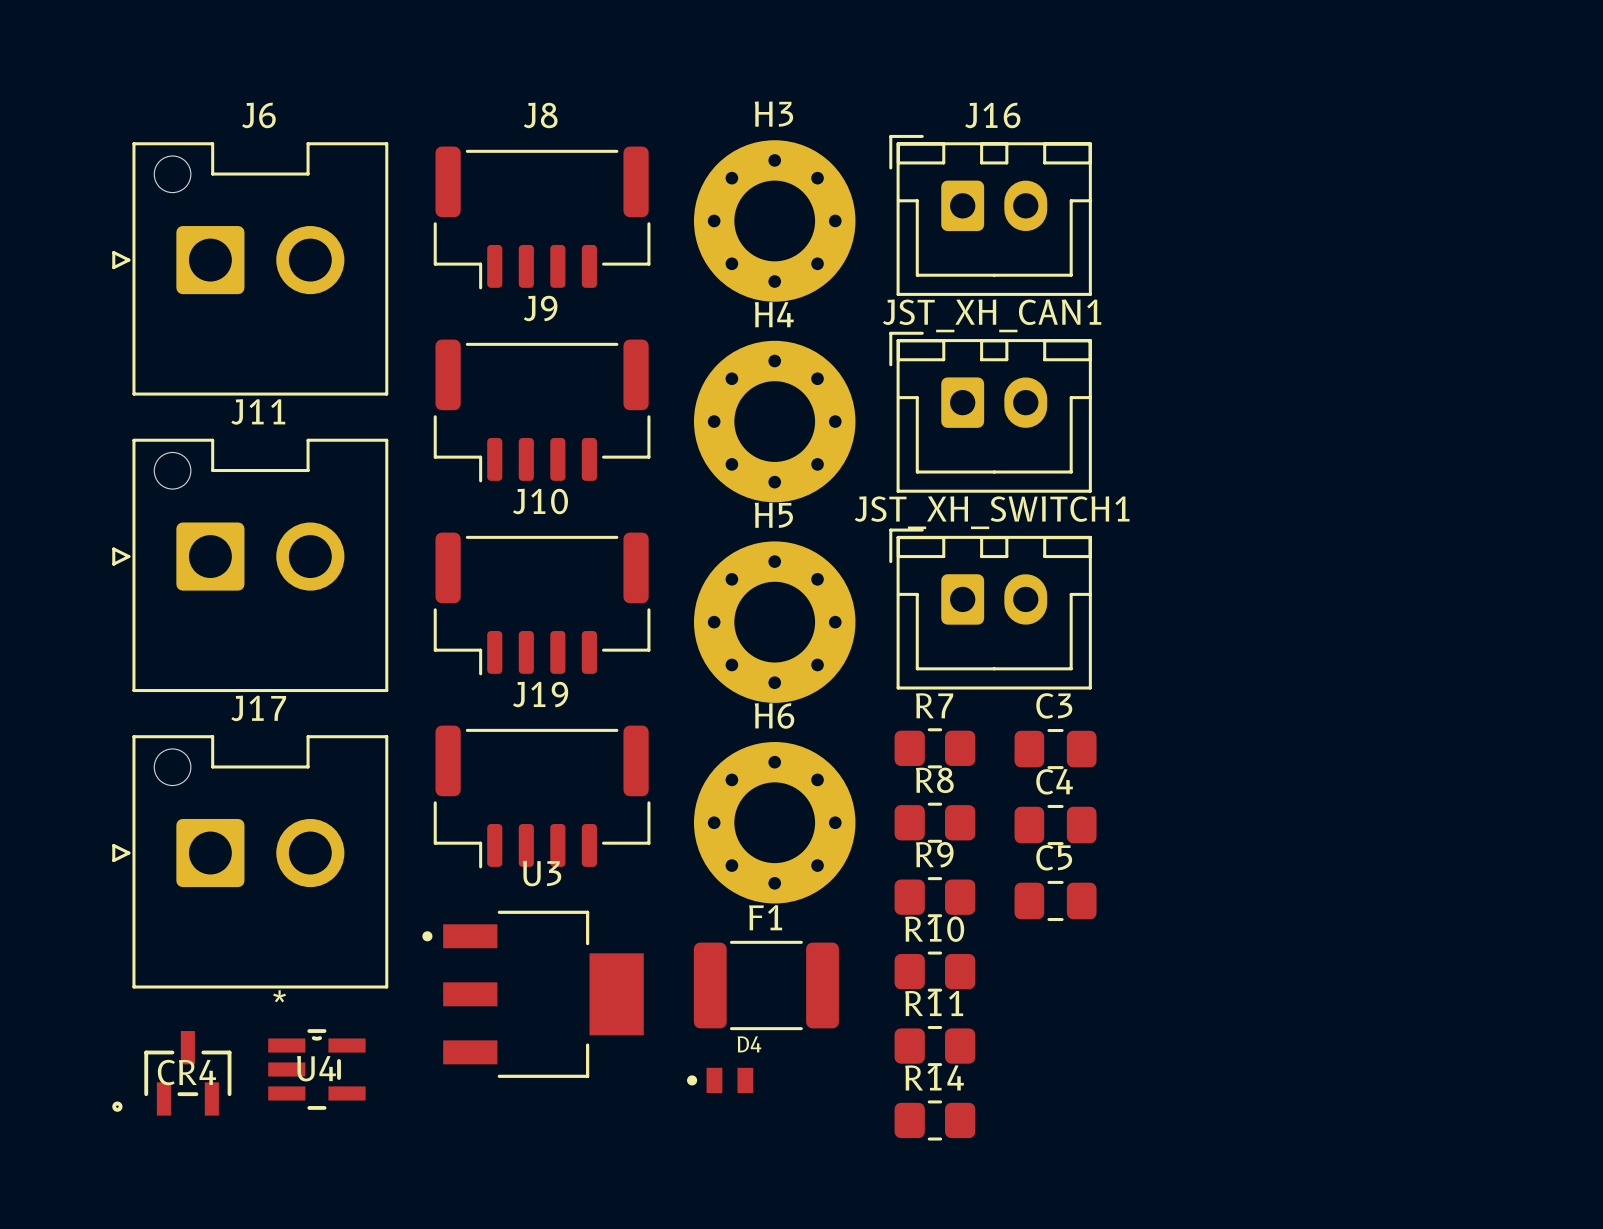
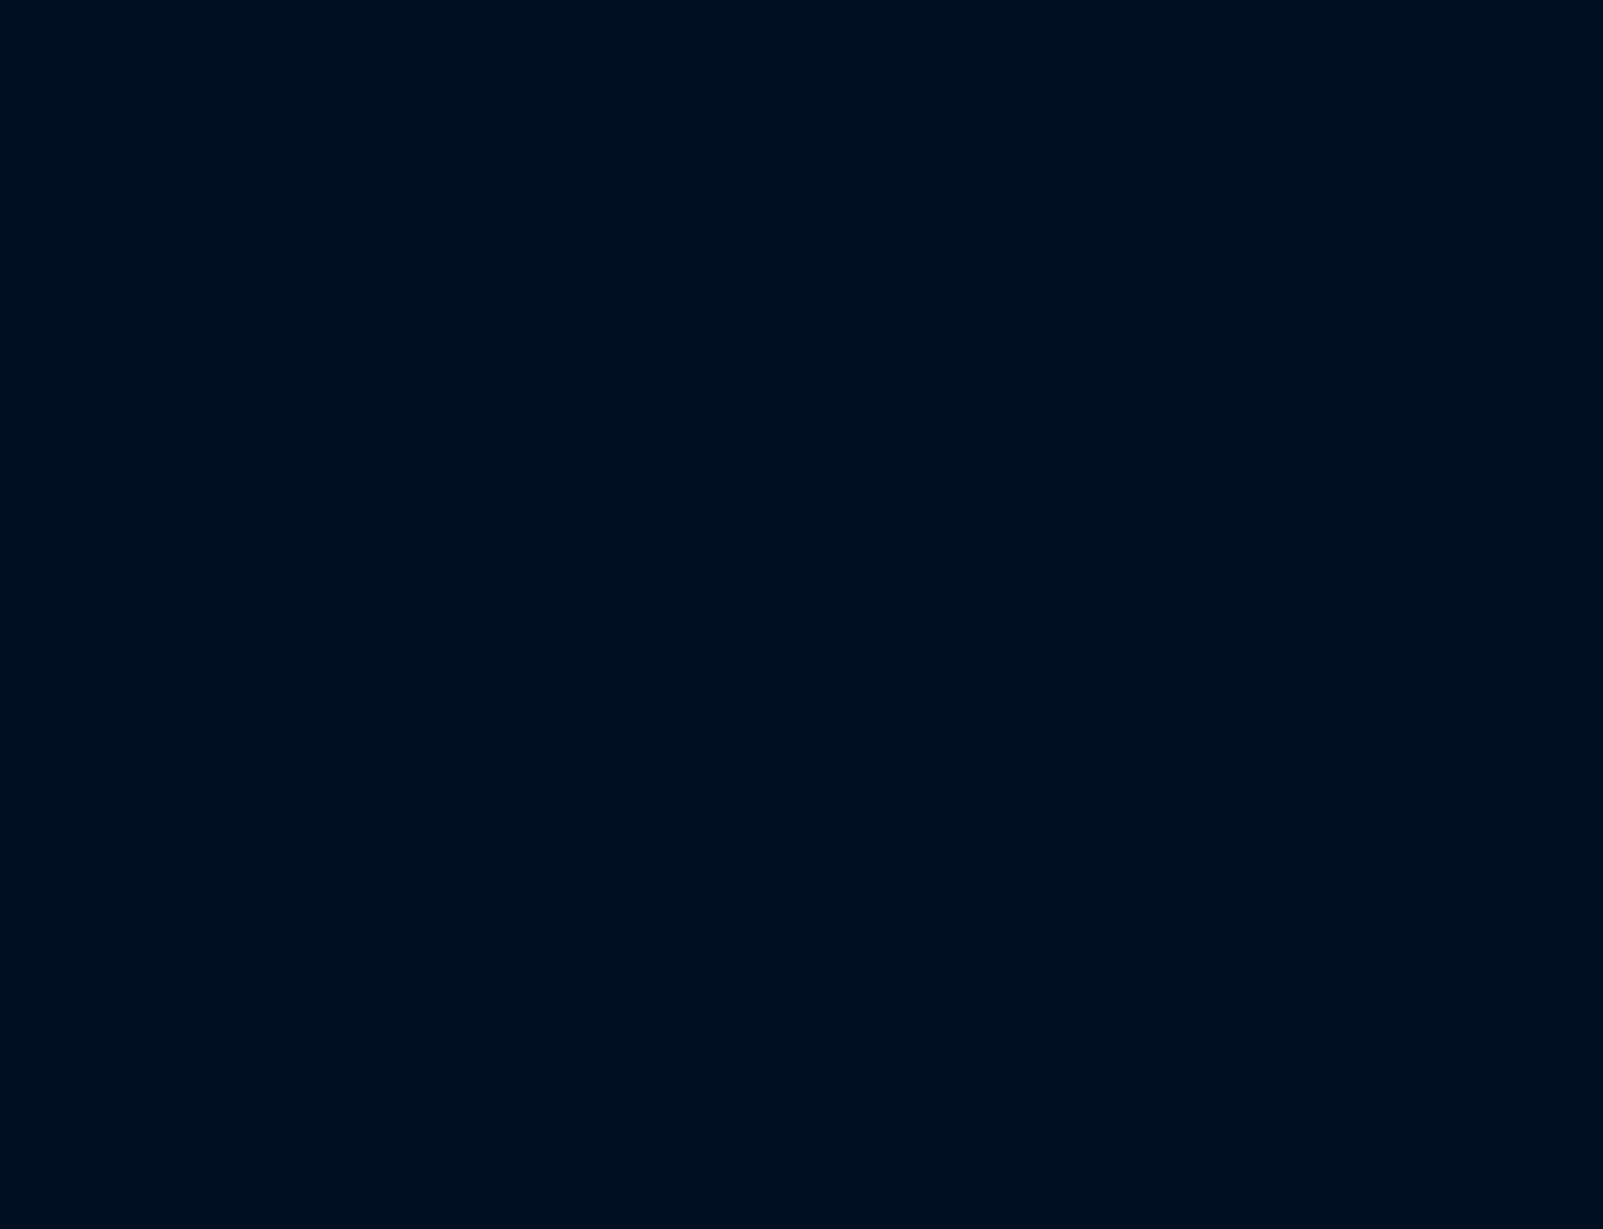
J16: (990, 215) -> none
J8: (542, 217) -> none
H3: (774, 220) -> none
J6: (250, 268) -> none
J9: (542, 410) -> none
JST_XH_CAN1: (990, 412) -> none
H4: (774, 421) -> none
J11: (250, 565) -> none
J10: (542, 603) -> none
JST_XH_SWITCH1: (990, 609) -> none
H5: (774, 622) -> none
R7: (934, 748) -> none
C3: (1055, 749) -> none
J19: (542, 797) -> none
H6: (774, 822) -> none
R8: (934, 822) -> none
C4: (1055, 825) -> none
J17: (250, 861) -> none
R9: (934, 897) -> none
C5: (1055, 900) -> none
R10: (934, 971) -> none
F1: (766, 985) -> none
U3: (533, 994) -> none
R11: (934, 1046) -> none
U4: (316, 1069) -> none
CR4: (171, 1073) -> none
D4: (720, 1080) -> none
R14: (934, 1120) -> none

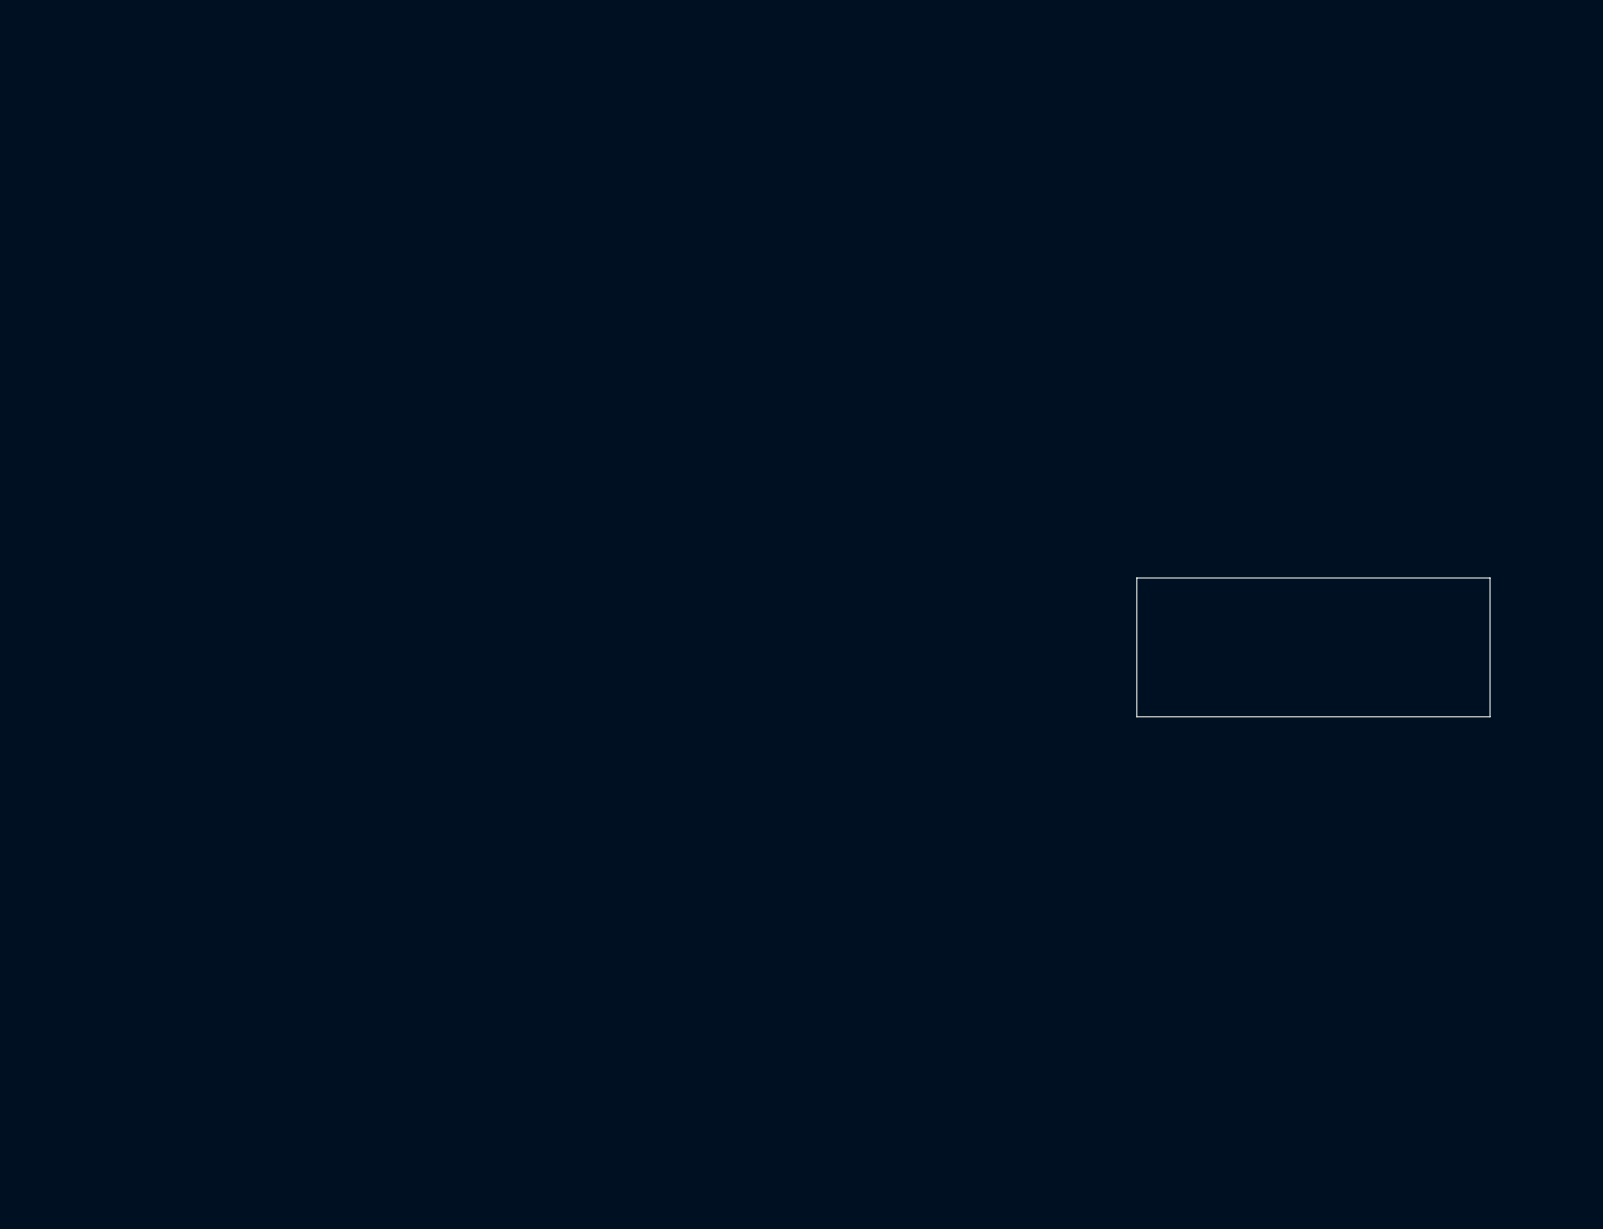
board edge: none -> (1136, 578) (1490, 578) (1490, 716) (1136, 716) (1136, 578)

